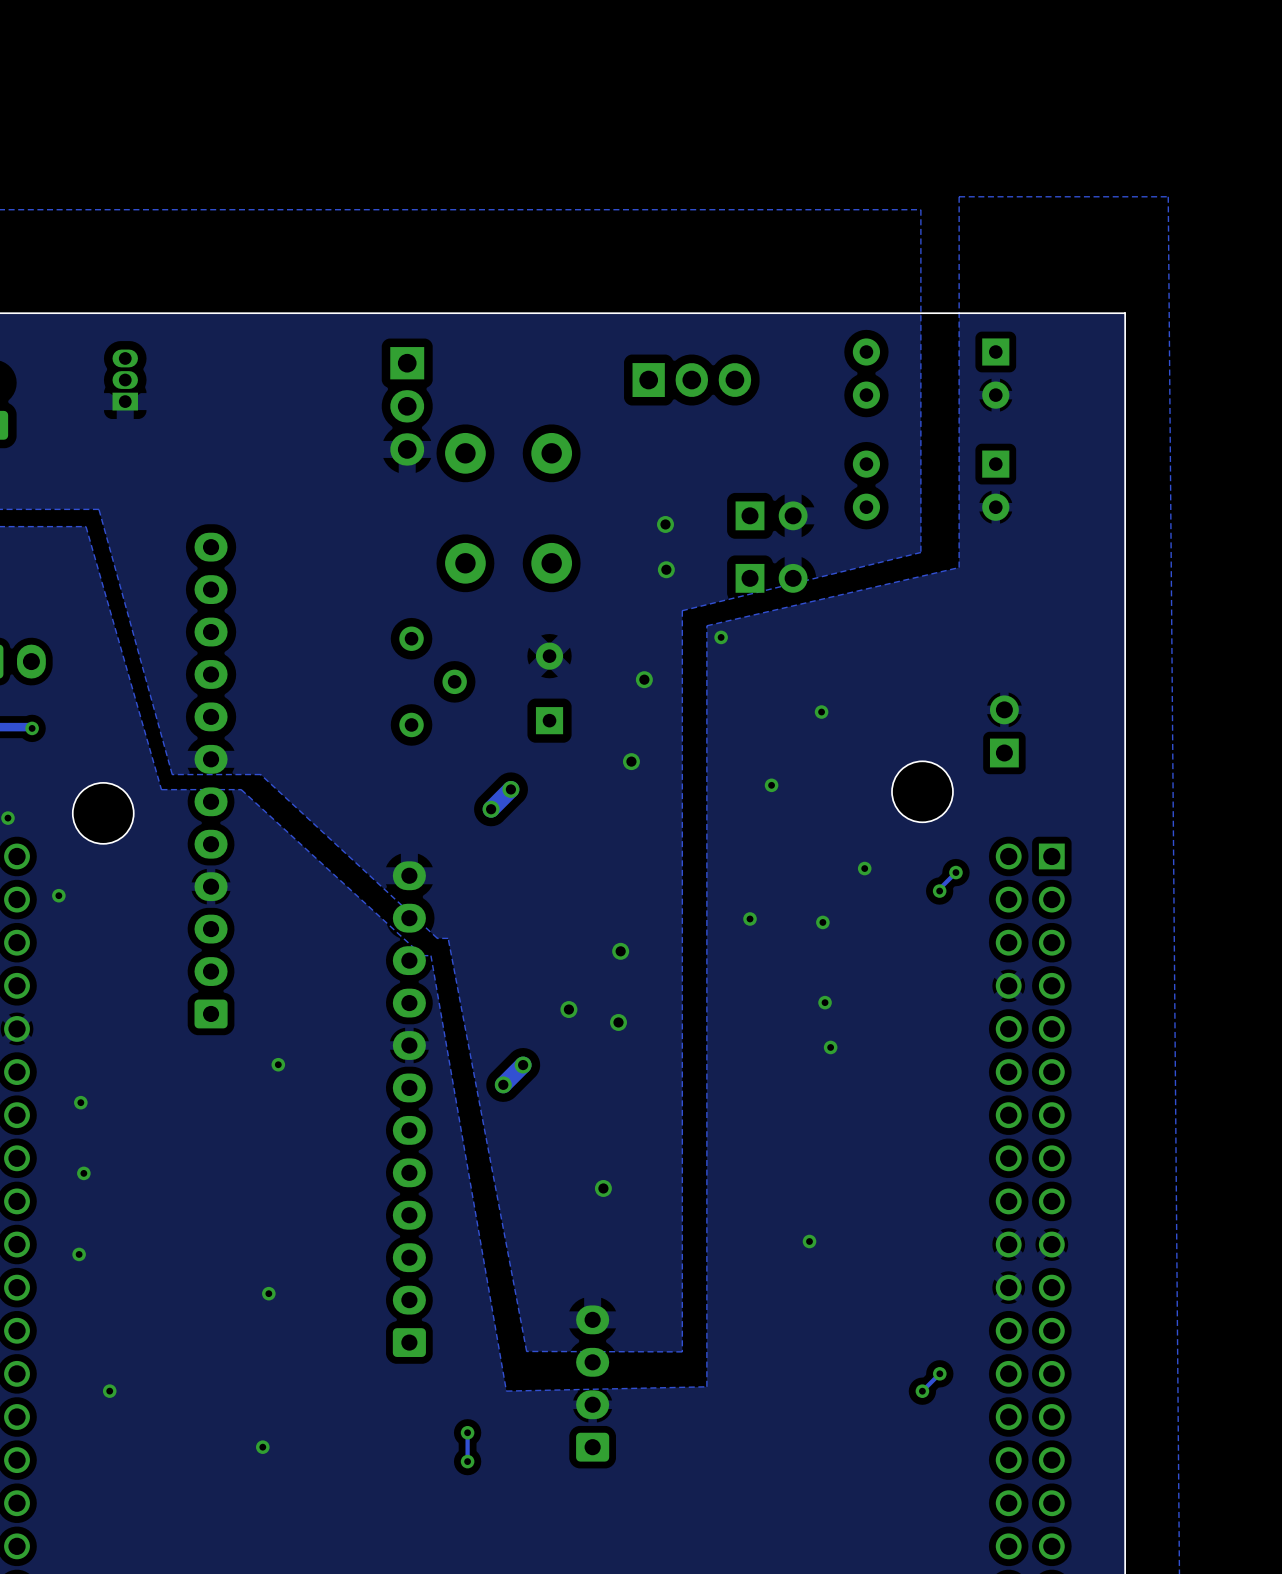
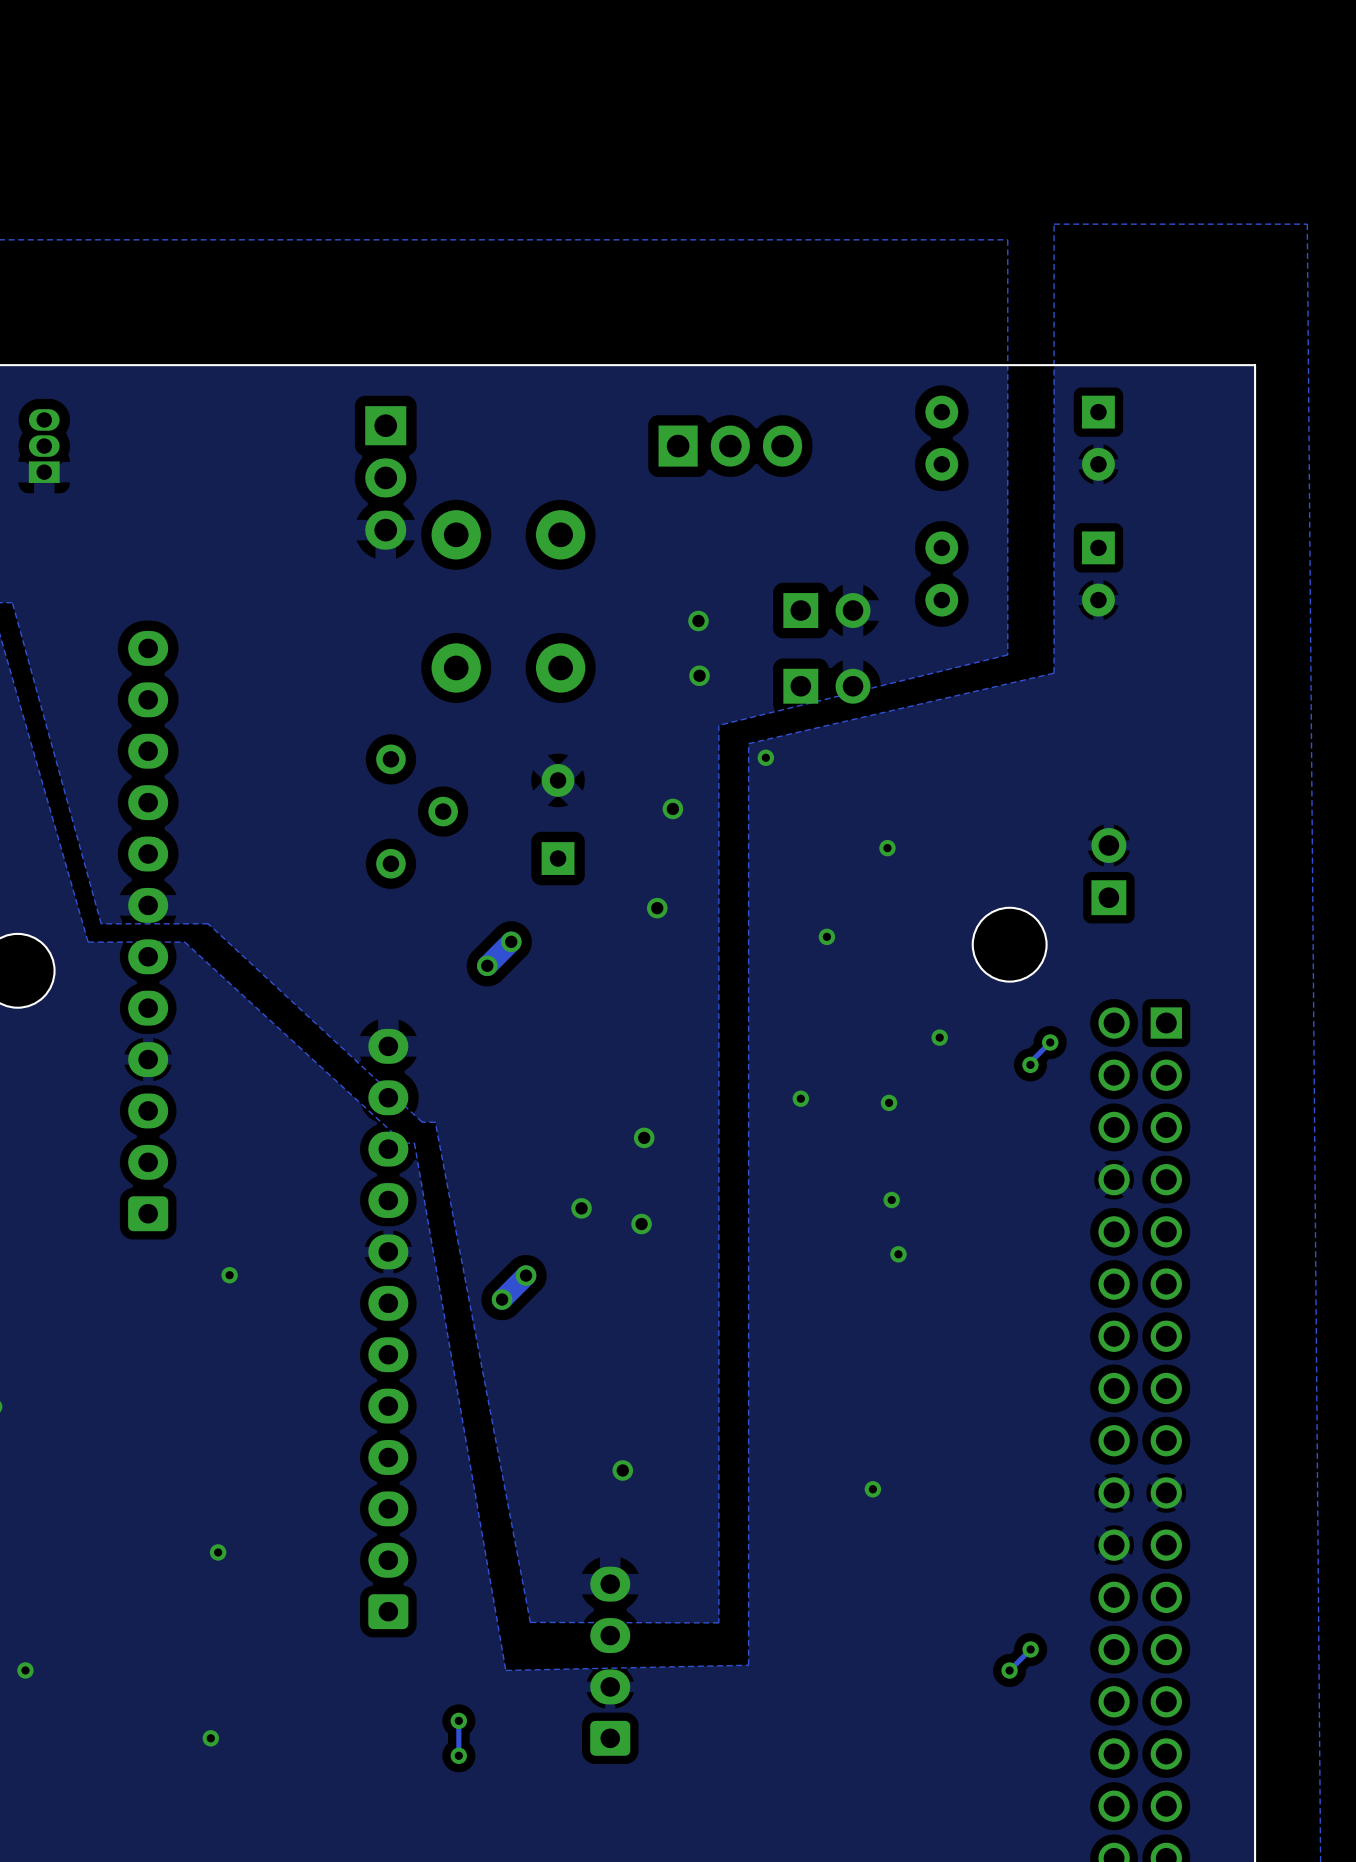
via position: (603, 1188) -> (622, 1470)

